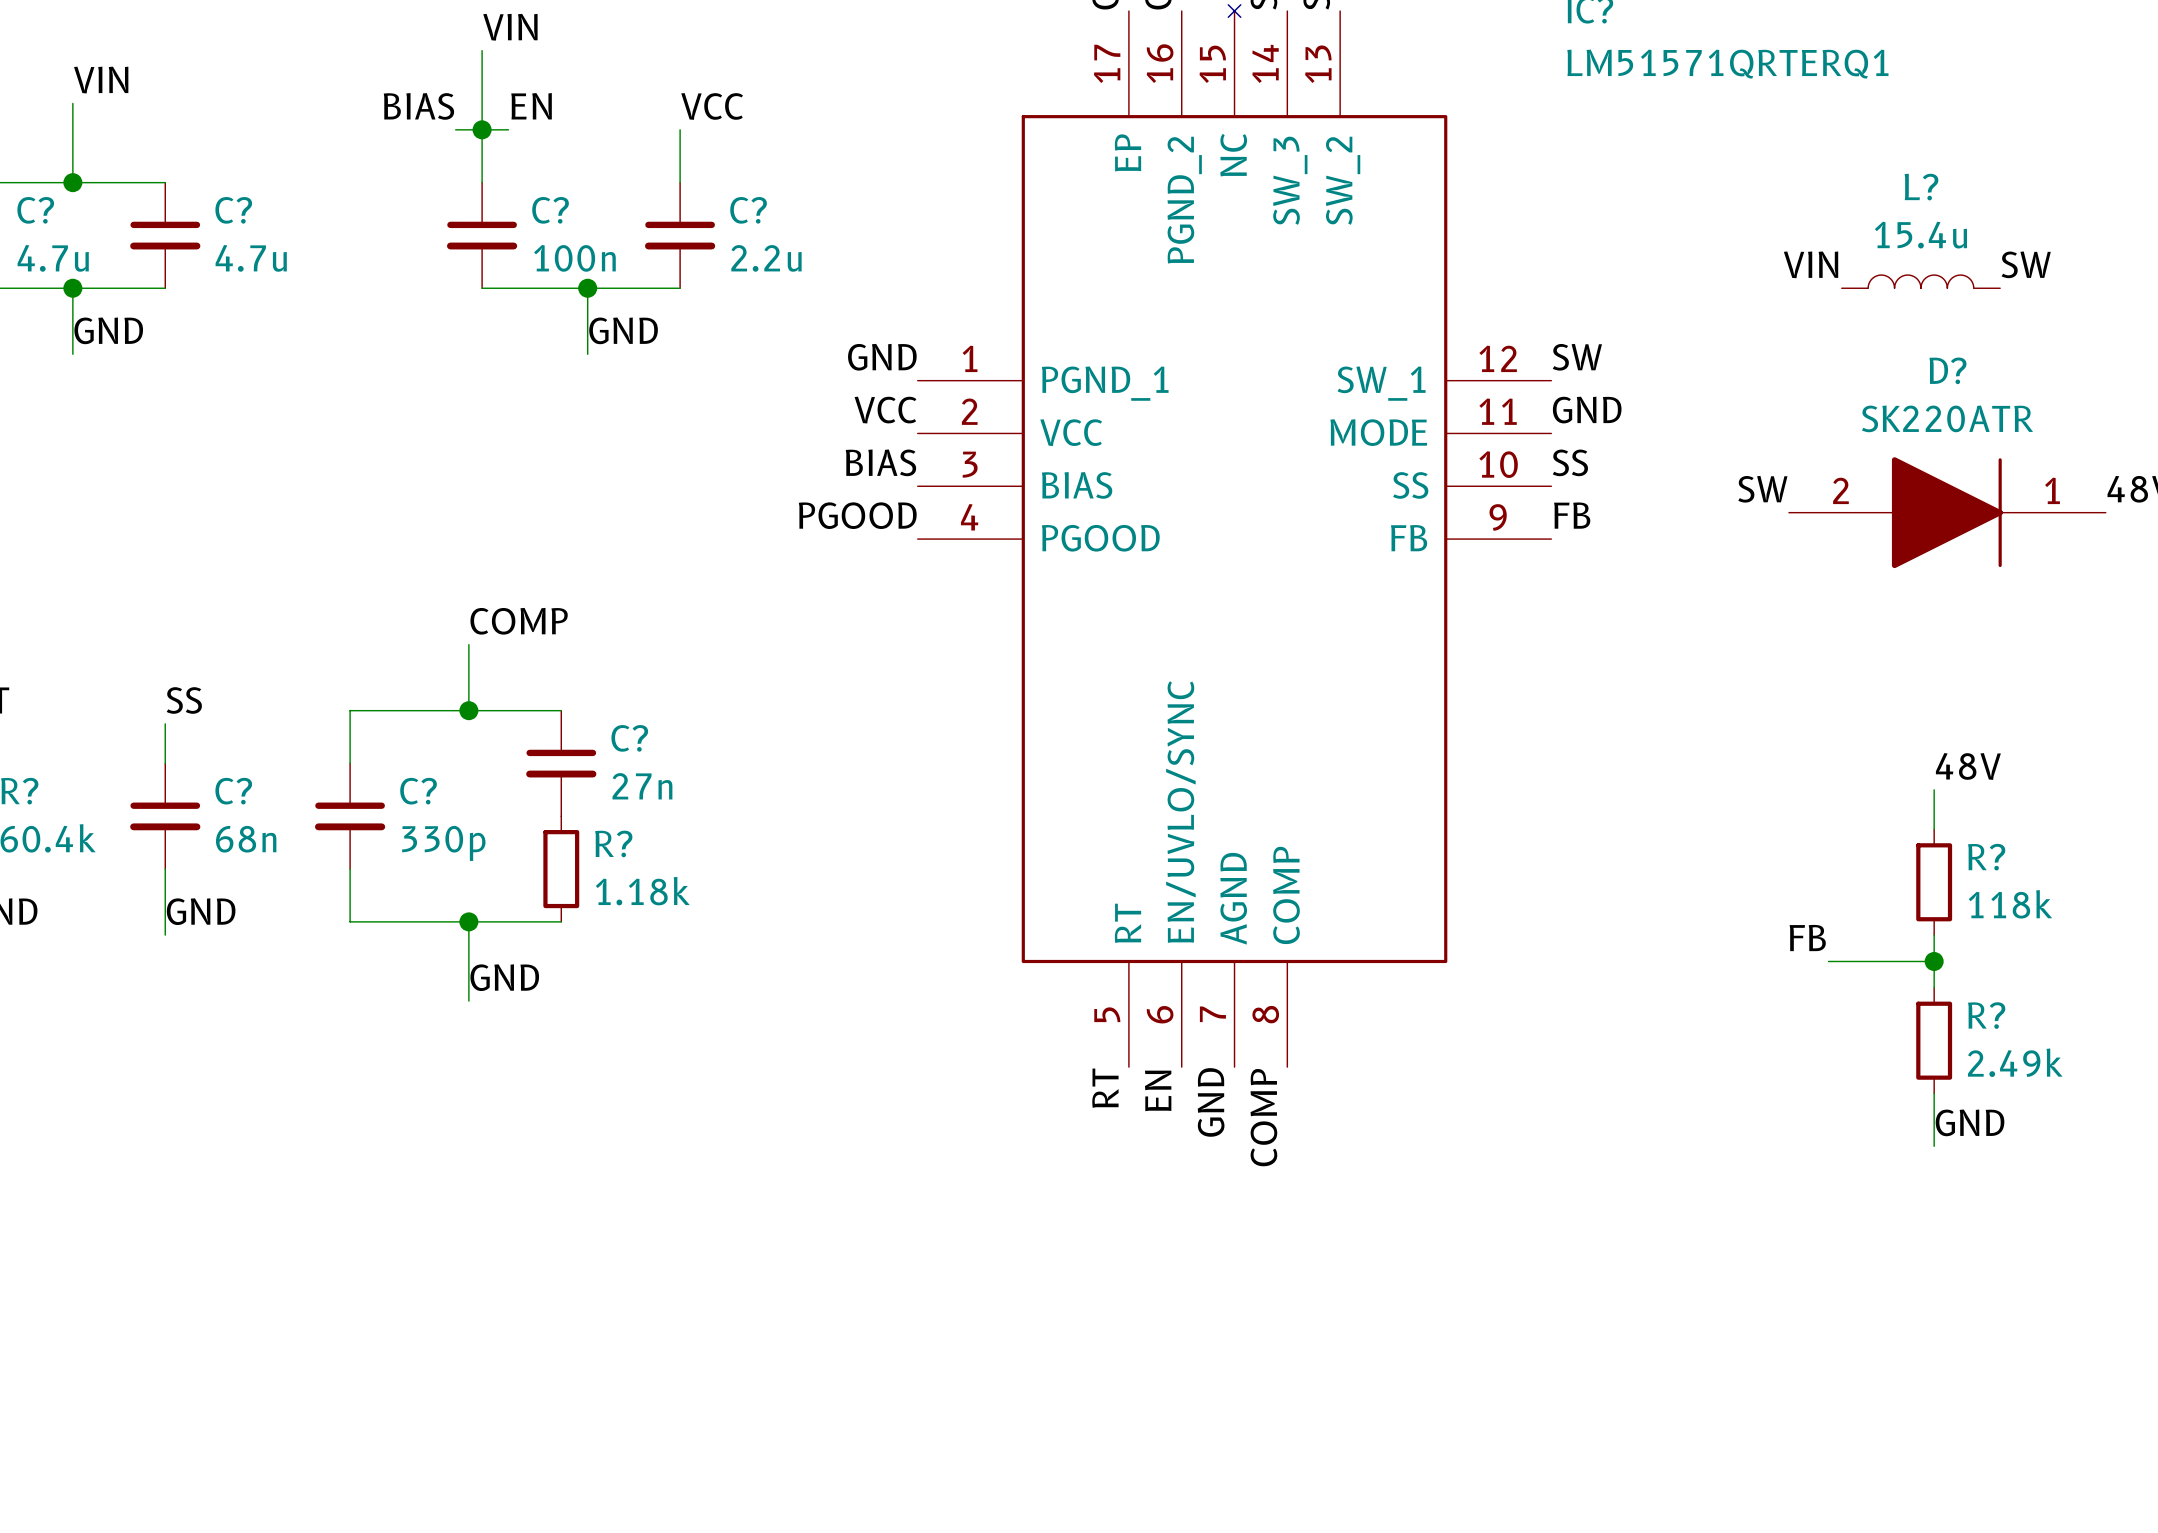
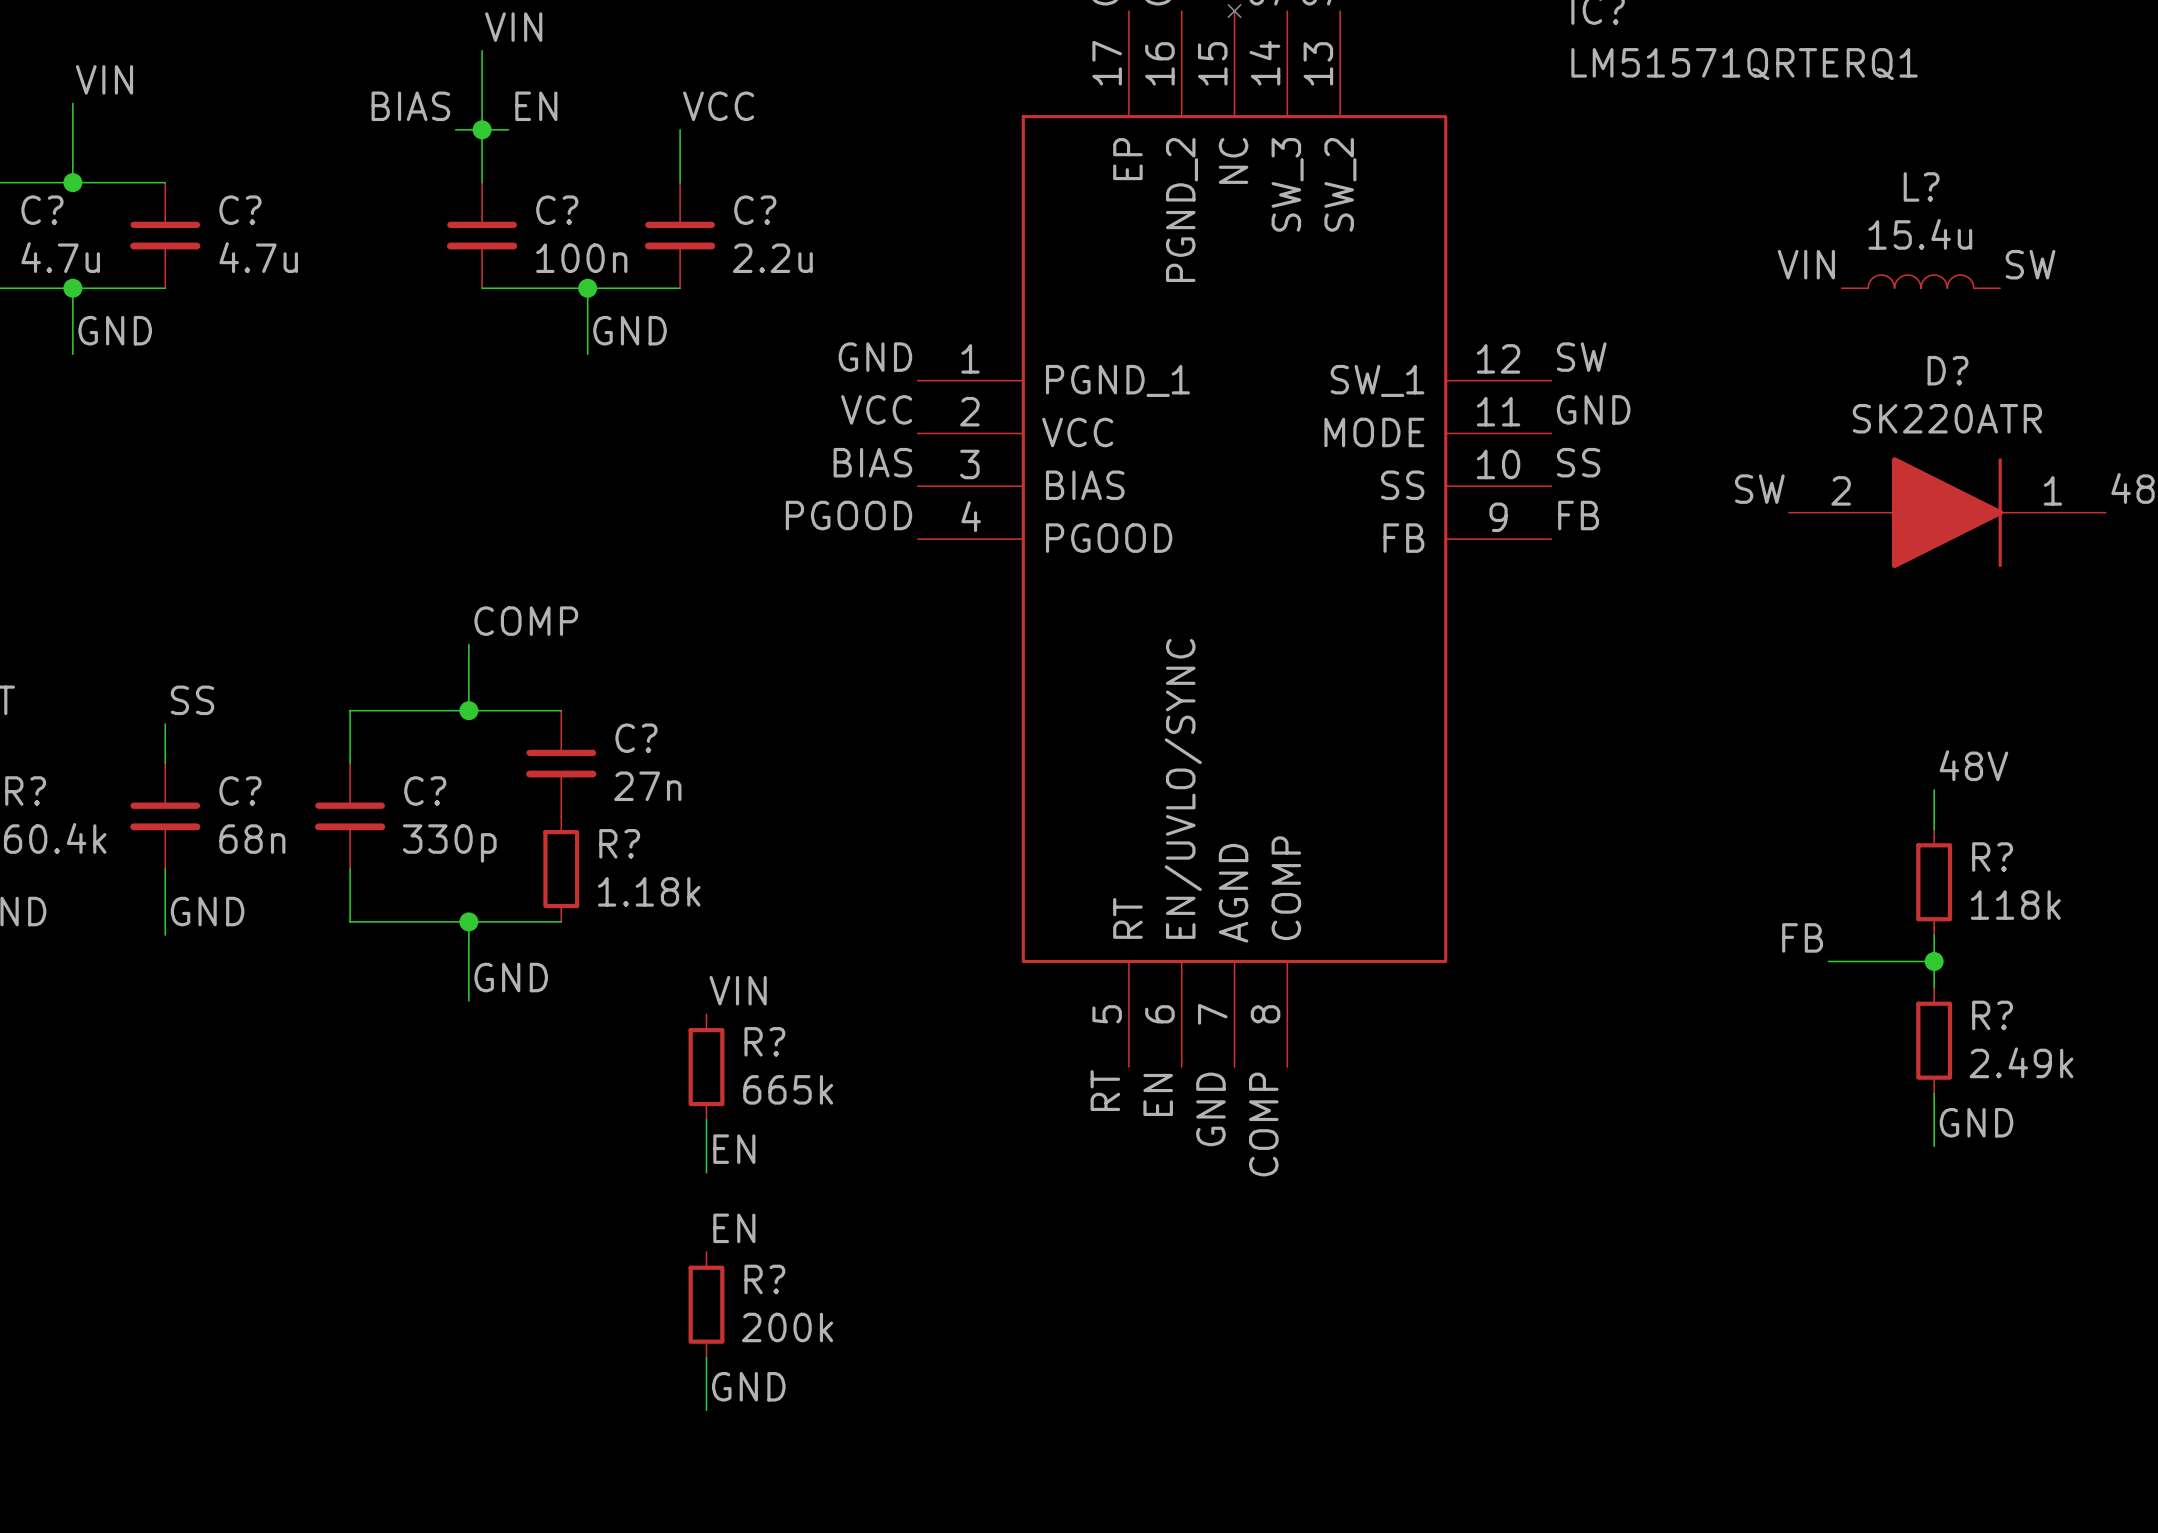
label: none -> VIN (738, 990)
R?: none -> 665k (706, 1067)
wire: none -> (706, 1119) (706, 1172)
label: none -> EN (734, 1149)
label: none -> EN (734, 1228)
R?: none -> 200k (706, 1304)
wire: none -> (706, 1357) (706, 1410)
label: none -> GND (748, 1386)

